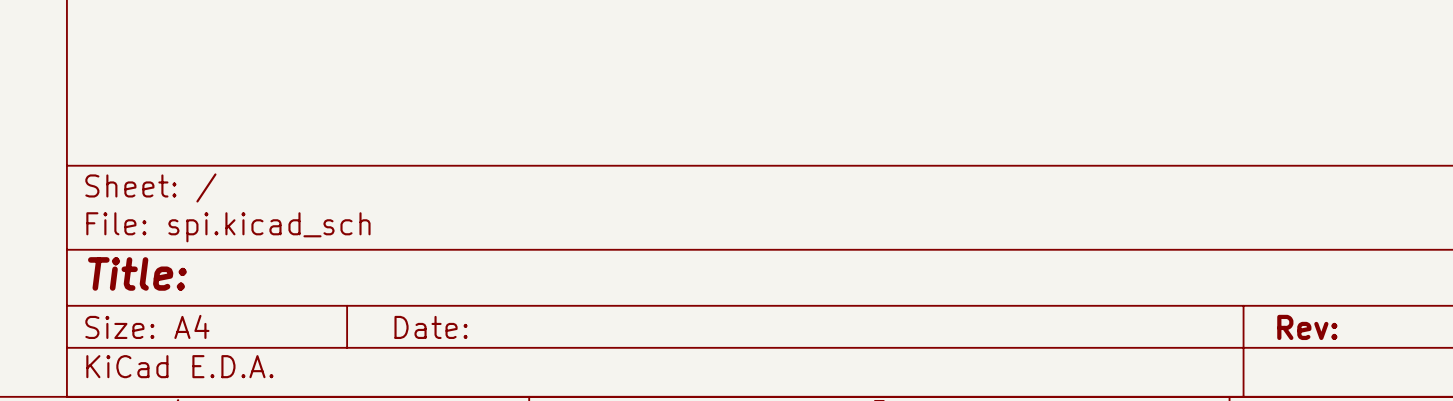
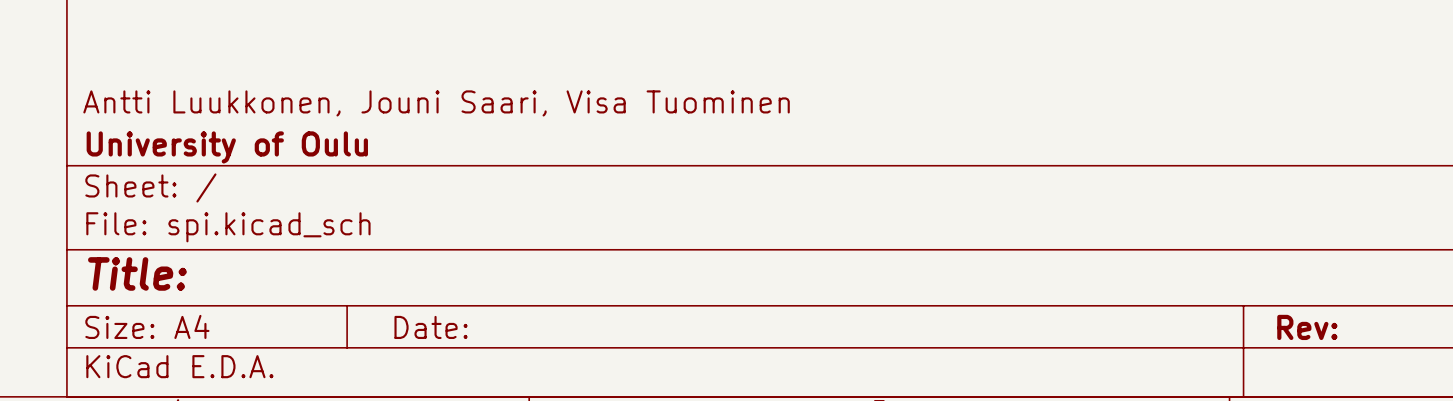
title block: none -> Antti Luukkonen, Jouni Saari, Visa Tuominen (436, 103)
title block: none -> University of Oulu (227, 147)

